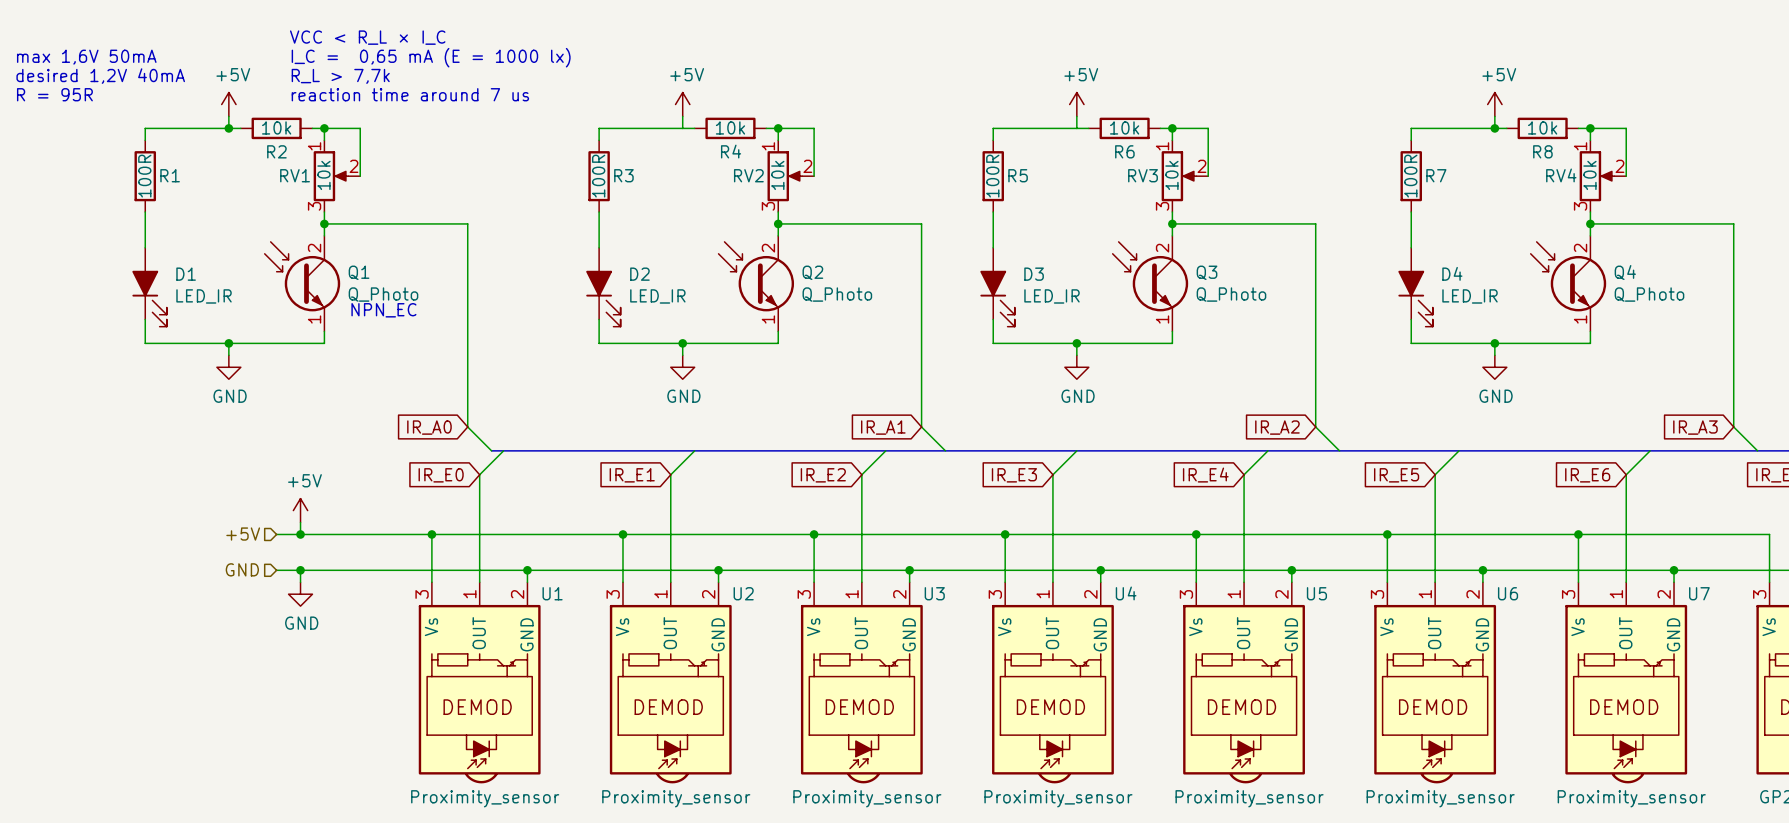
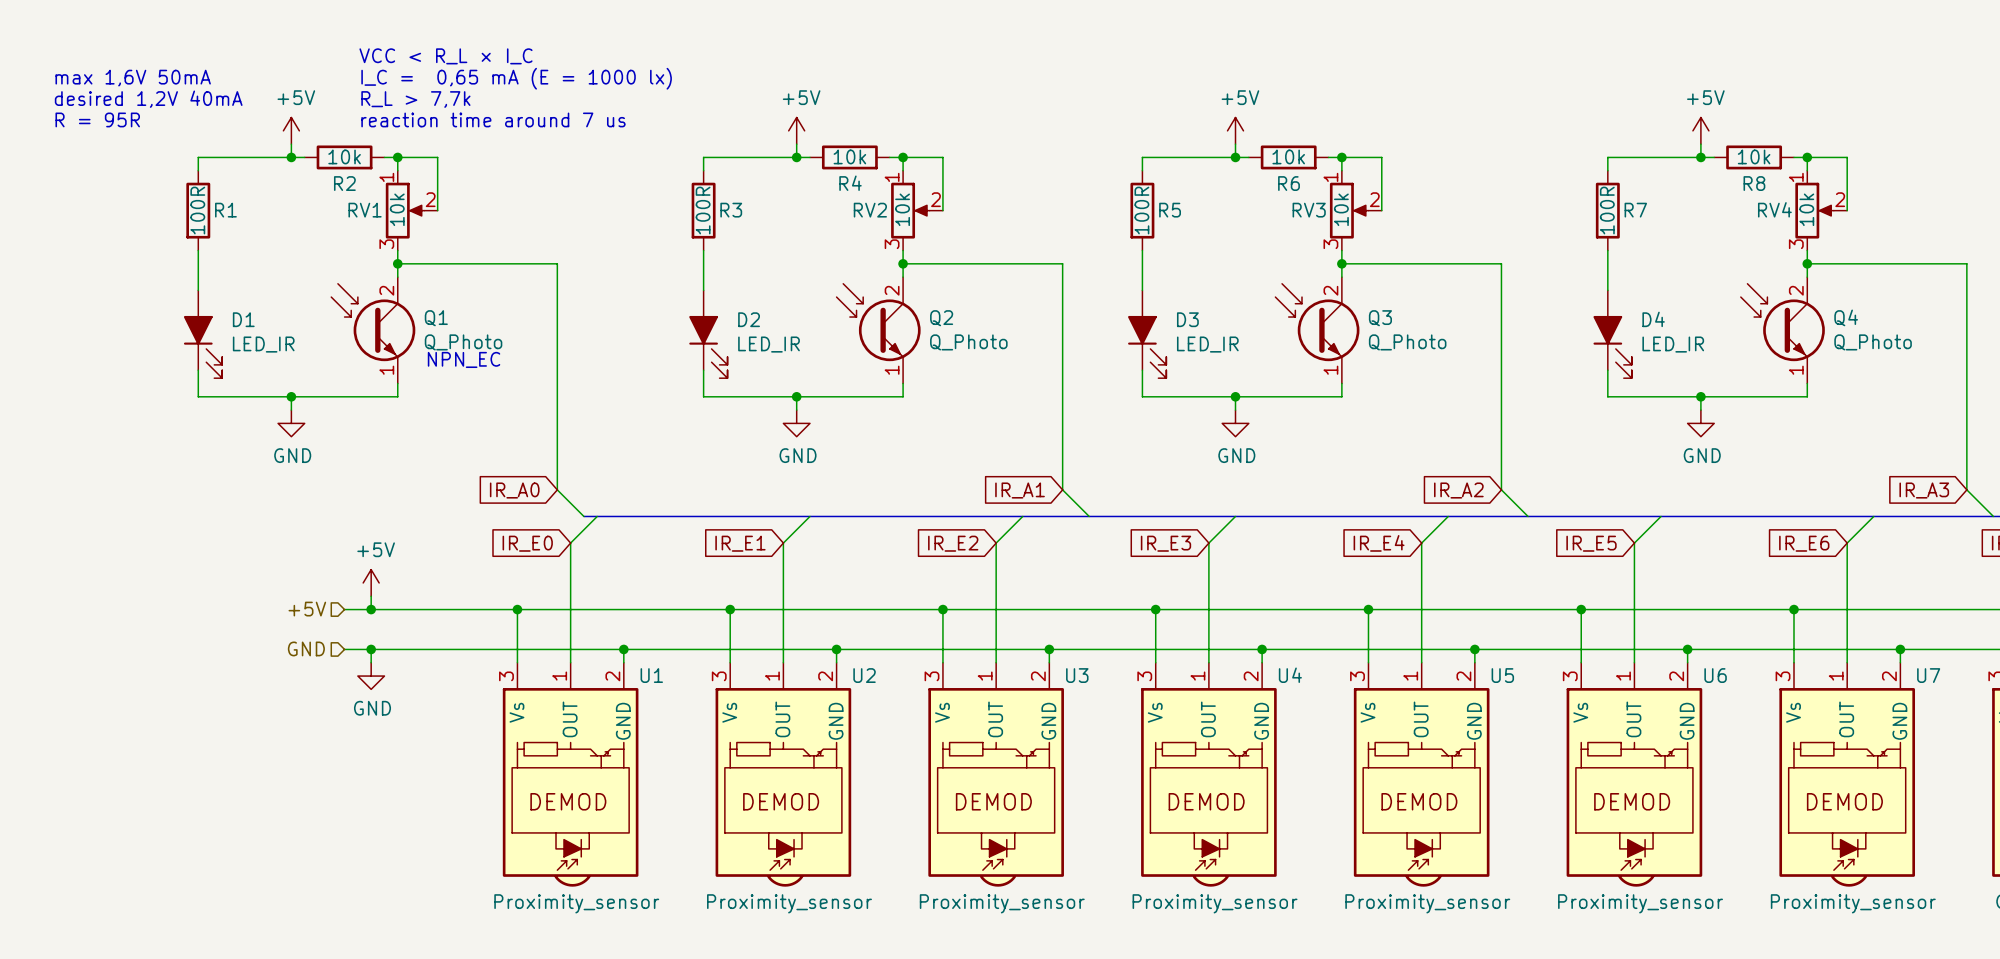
junction: none -> (796, 157)
junction: none -> (1235, 157)

